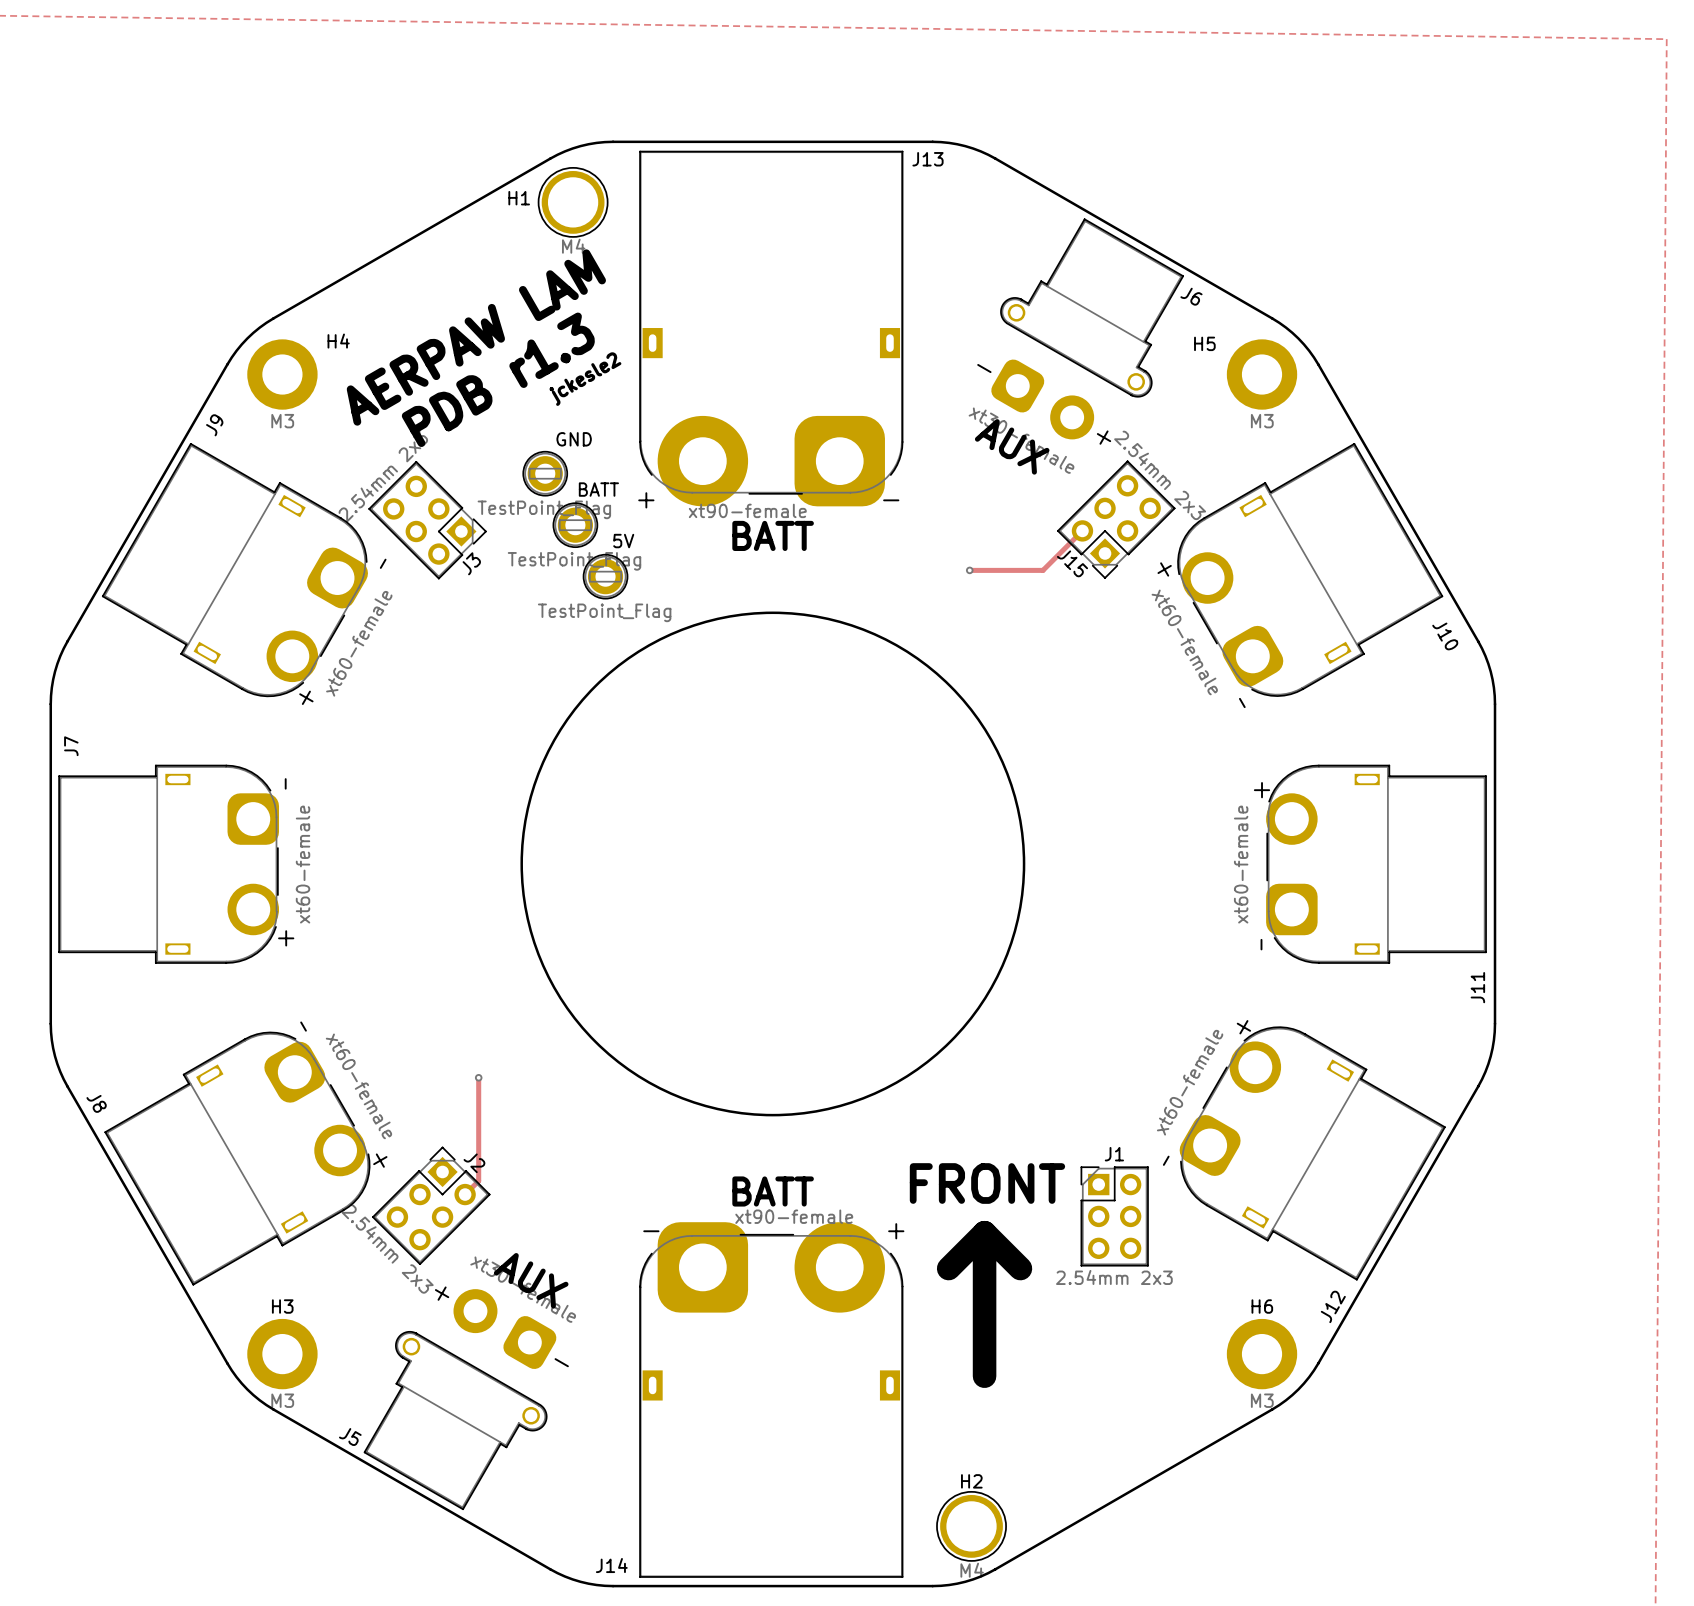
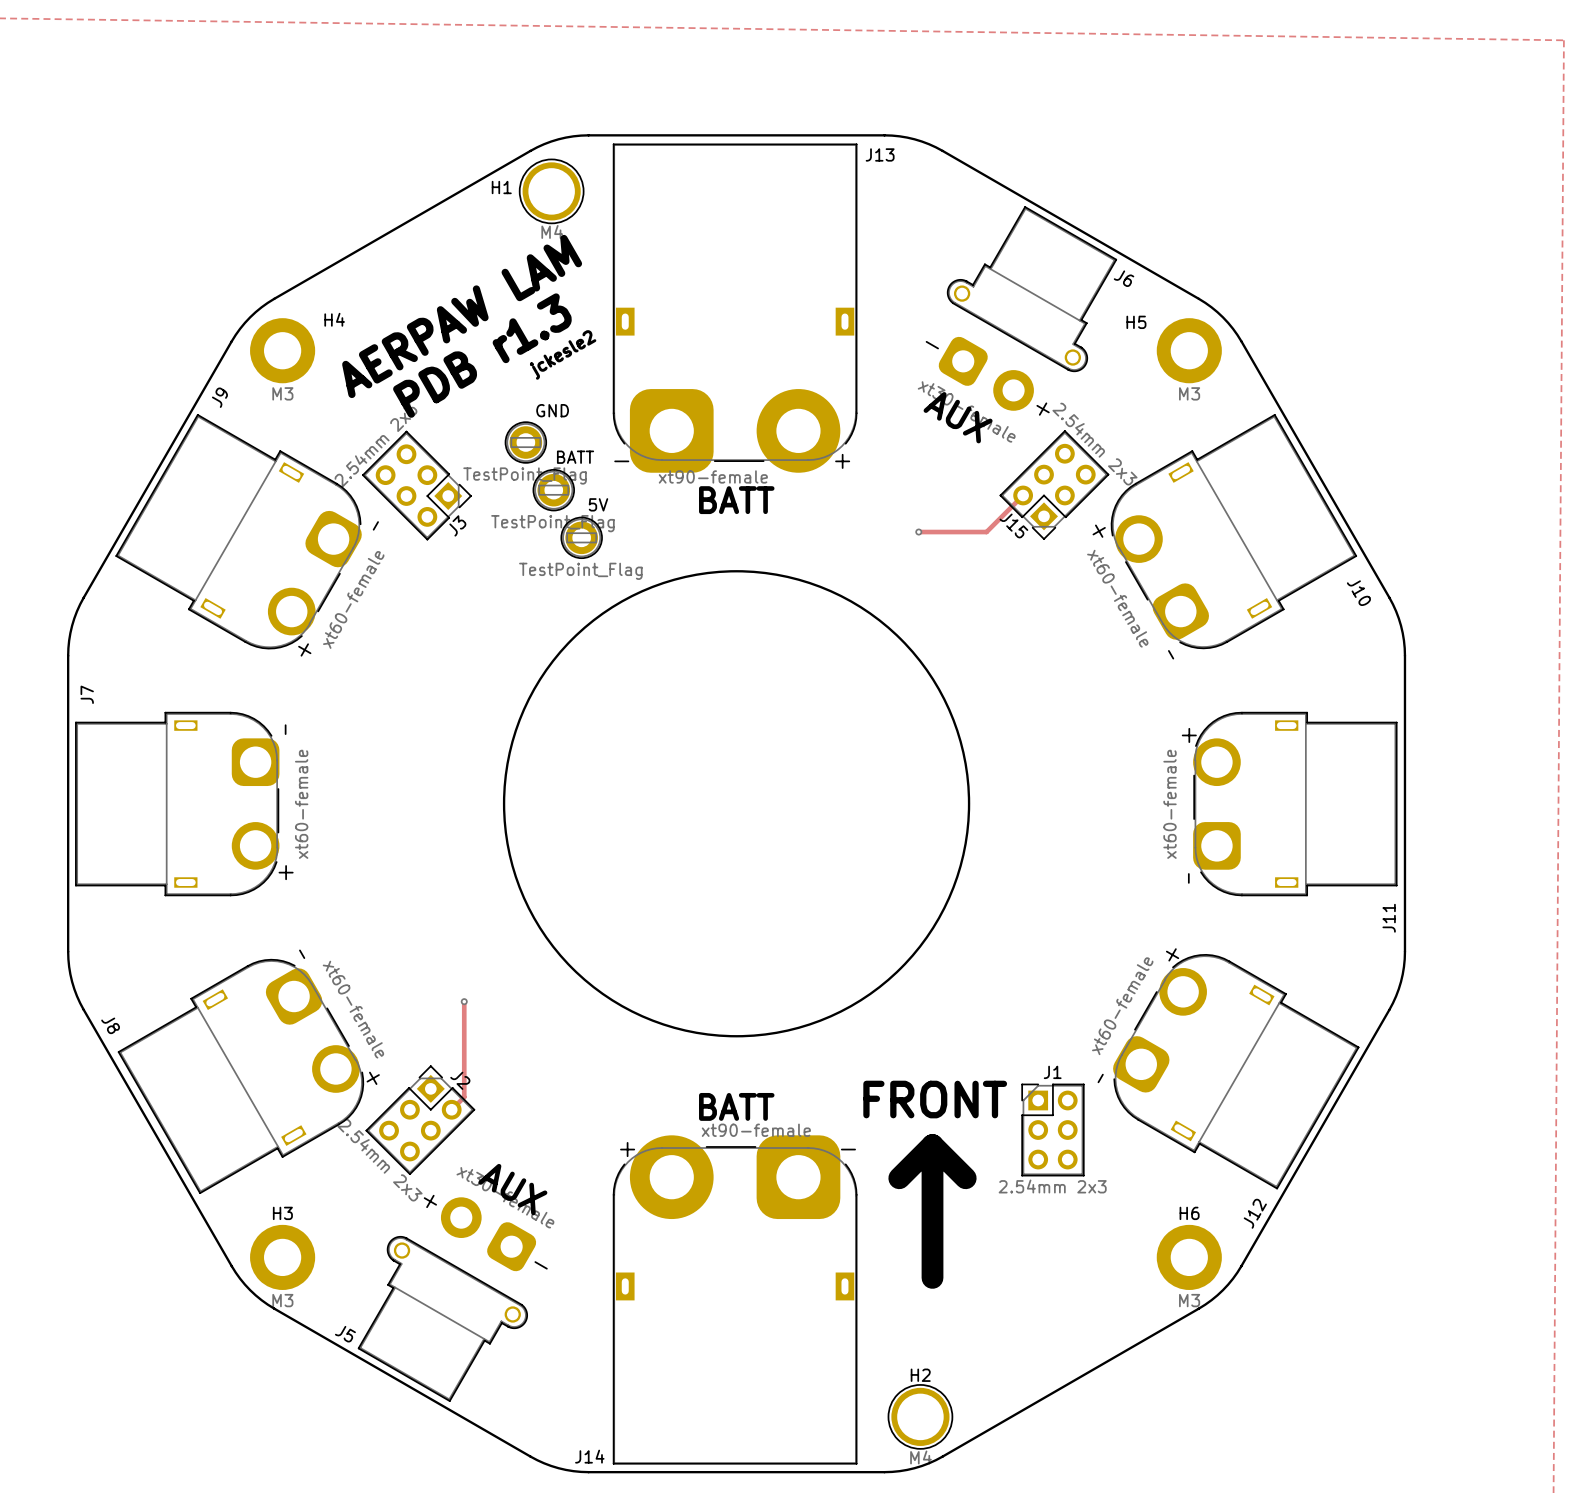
J13 footprint: [639, 150, 904, 507] -> [612, 143, 858, 473]
J14 footprint: [639, 1222, 904, 1578] -> [612, 1135, 858, 1465]

